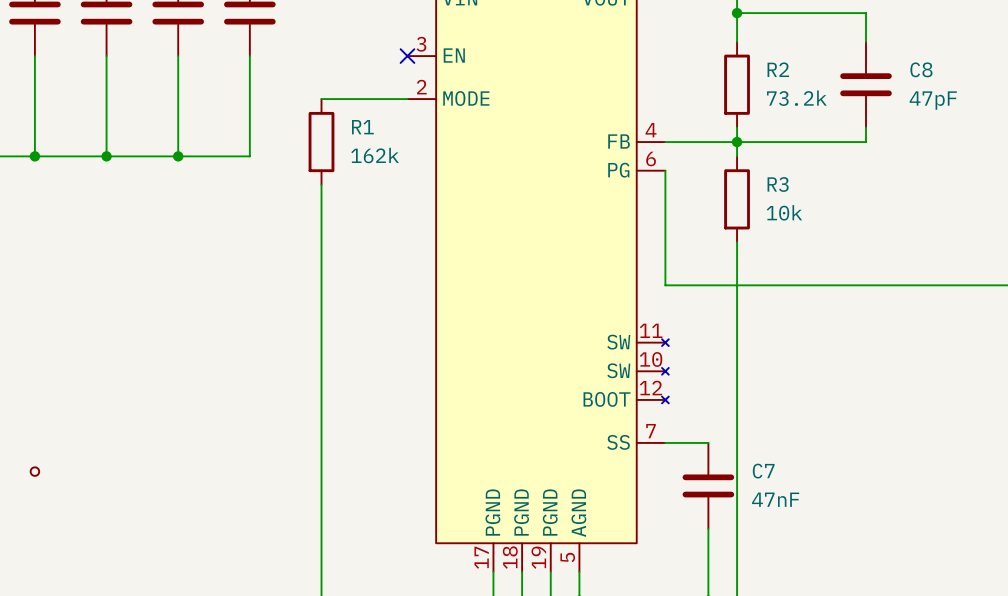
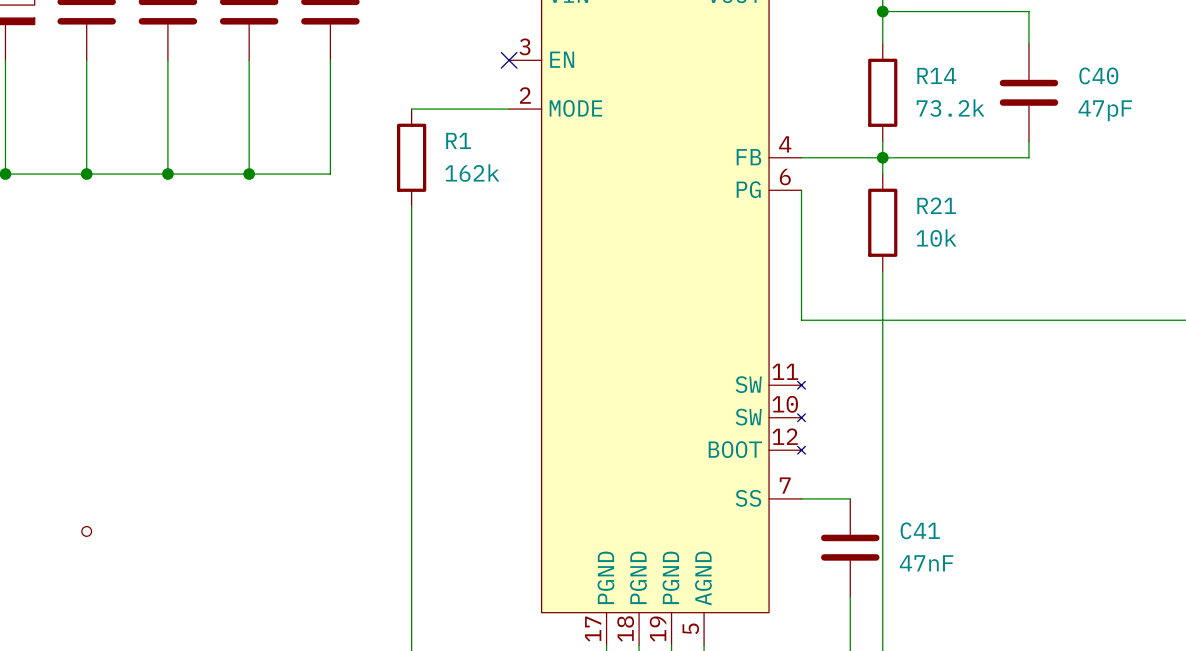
R2 name: R2 (778, 69) -> R14 (936, 75)
C8 name: C8 (921, 69) -> C40 (1098, 75)
R3 name: R3 (778, 184) -> R21 (936, 205)
C7 name: C7 (763, 471) -> C41 (920, 530)

